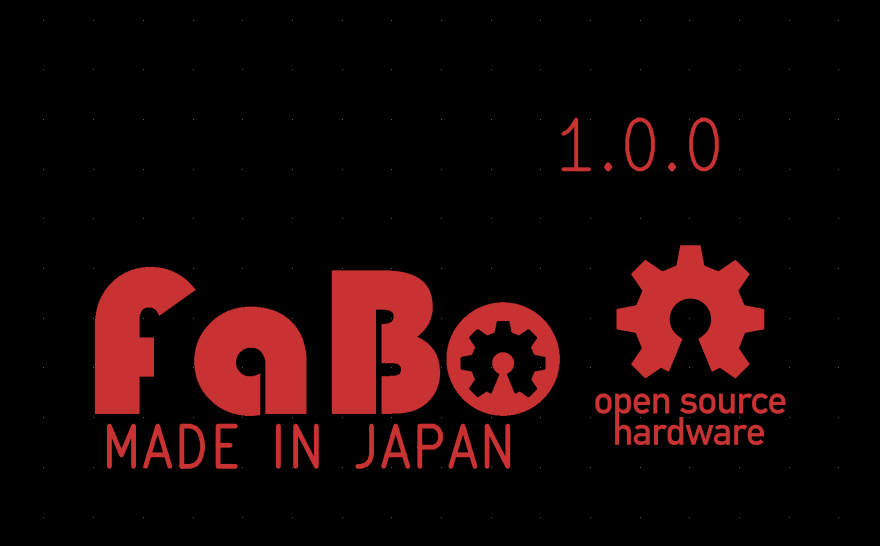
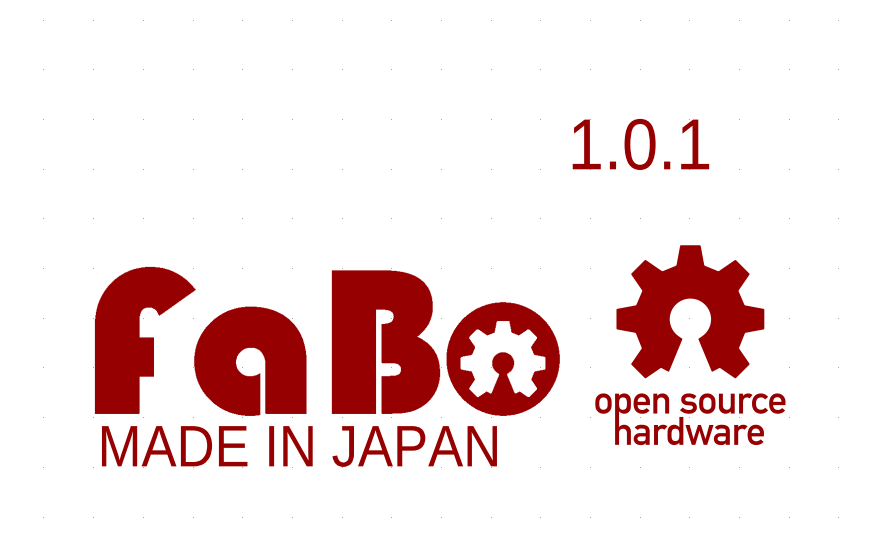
text: 1.0.0 (640, 144) -> 1.0.1 (640, 144)

